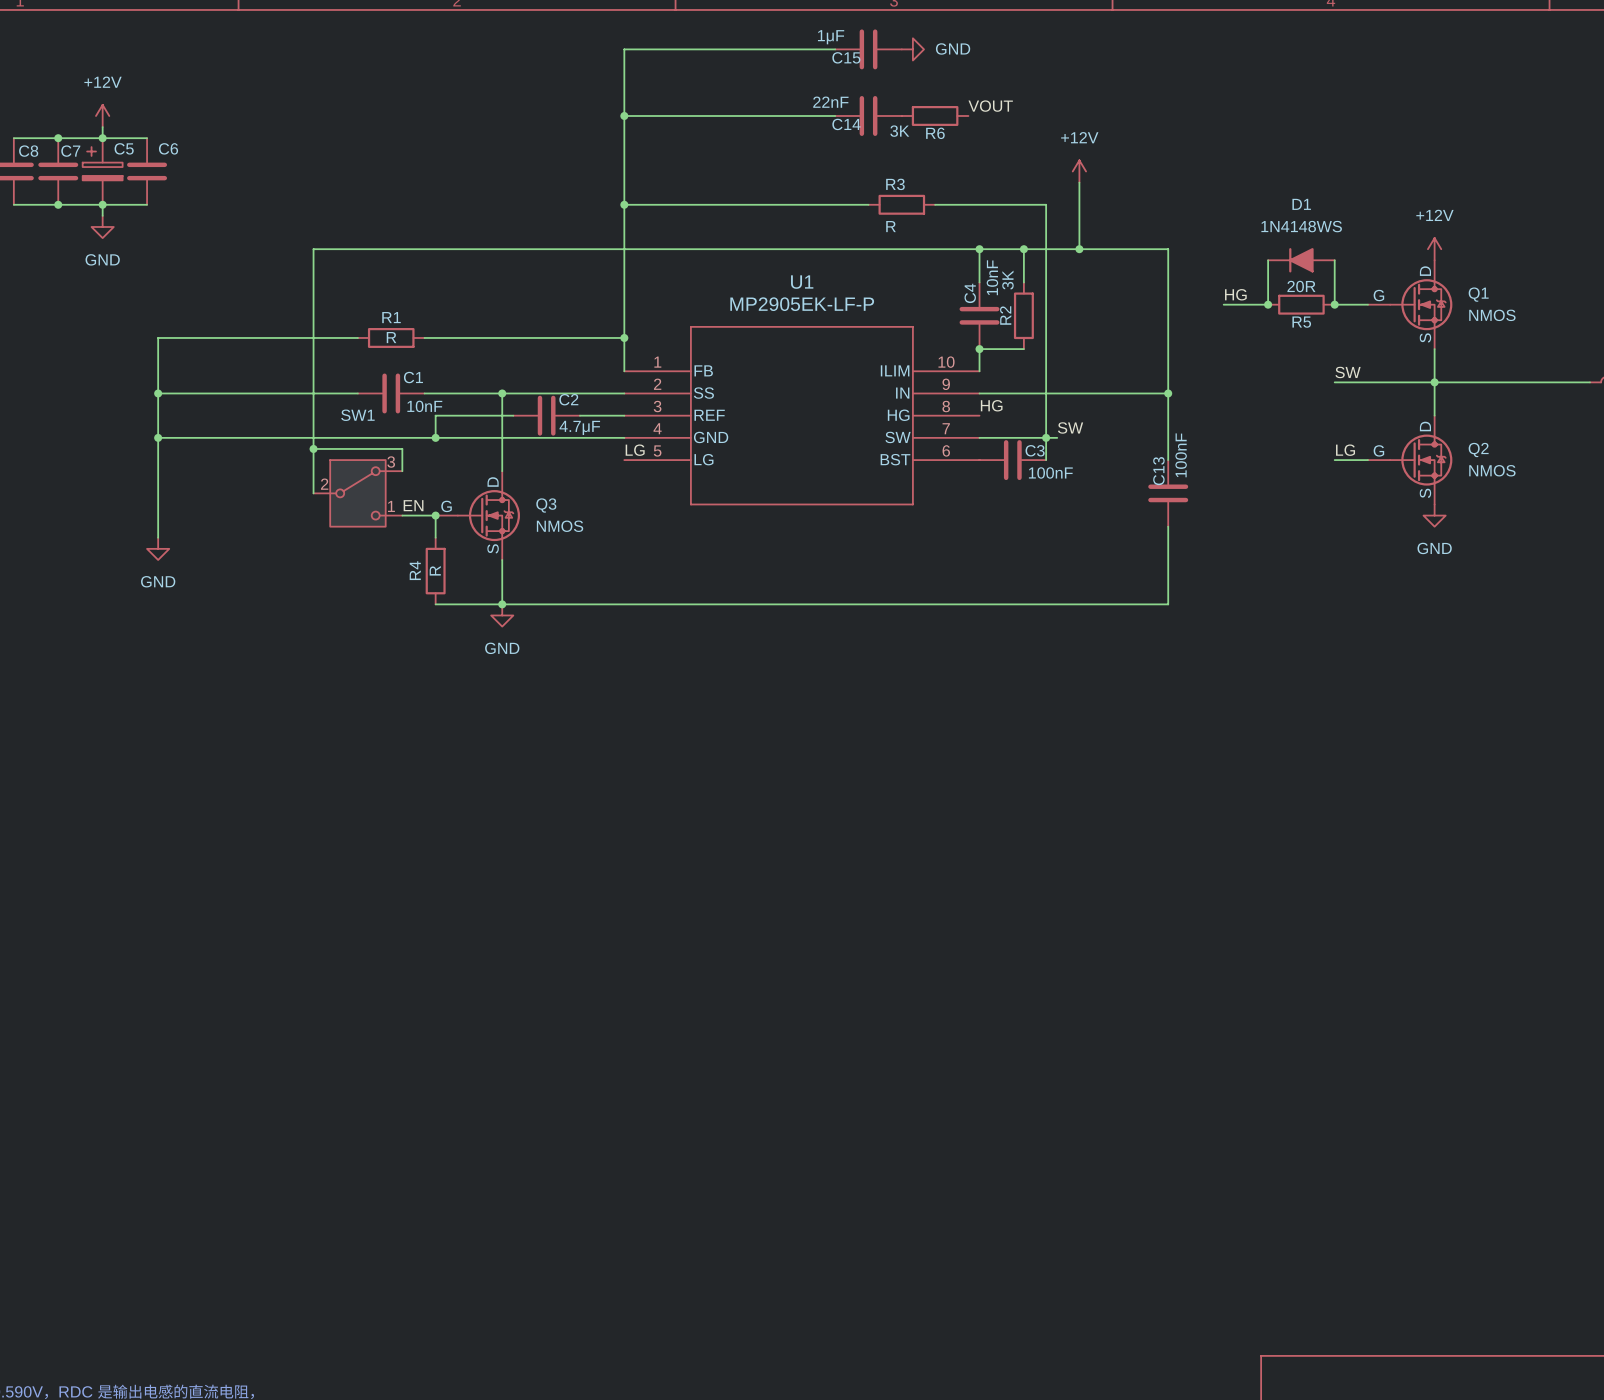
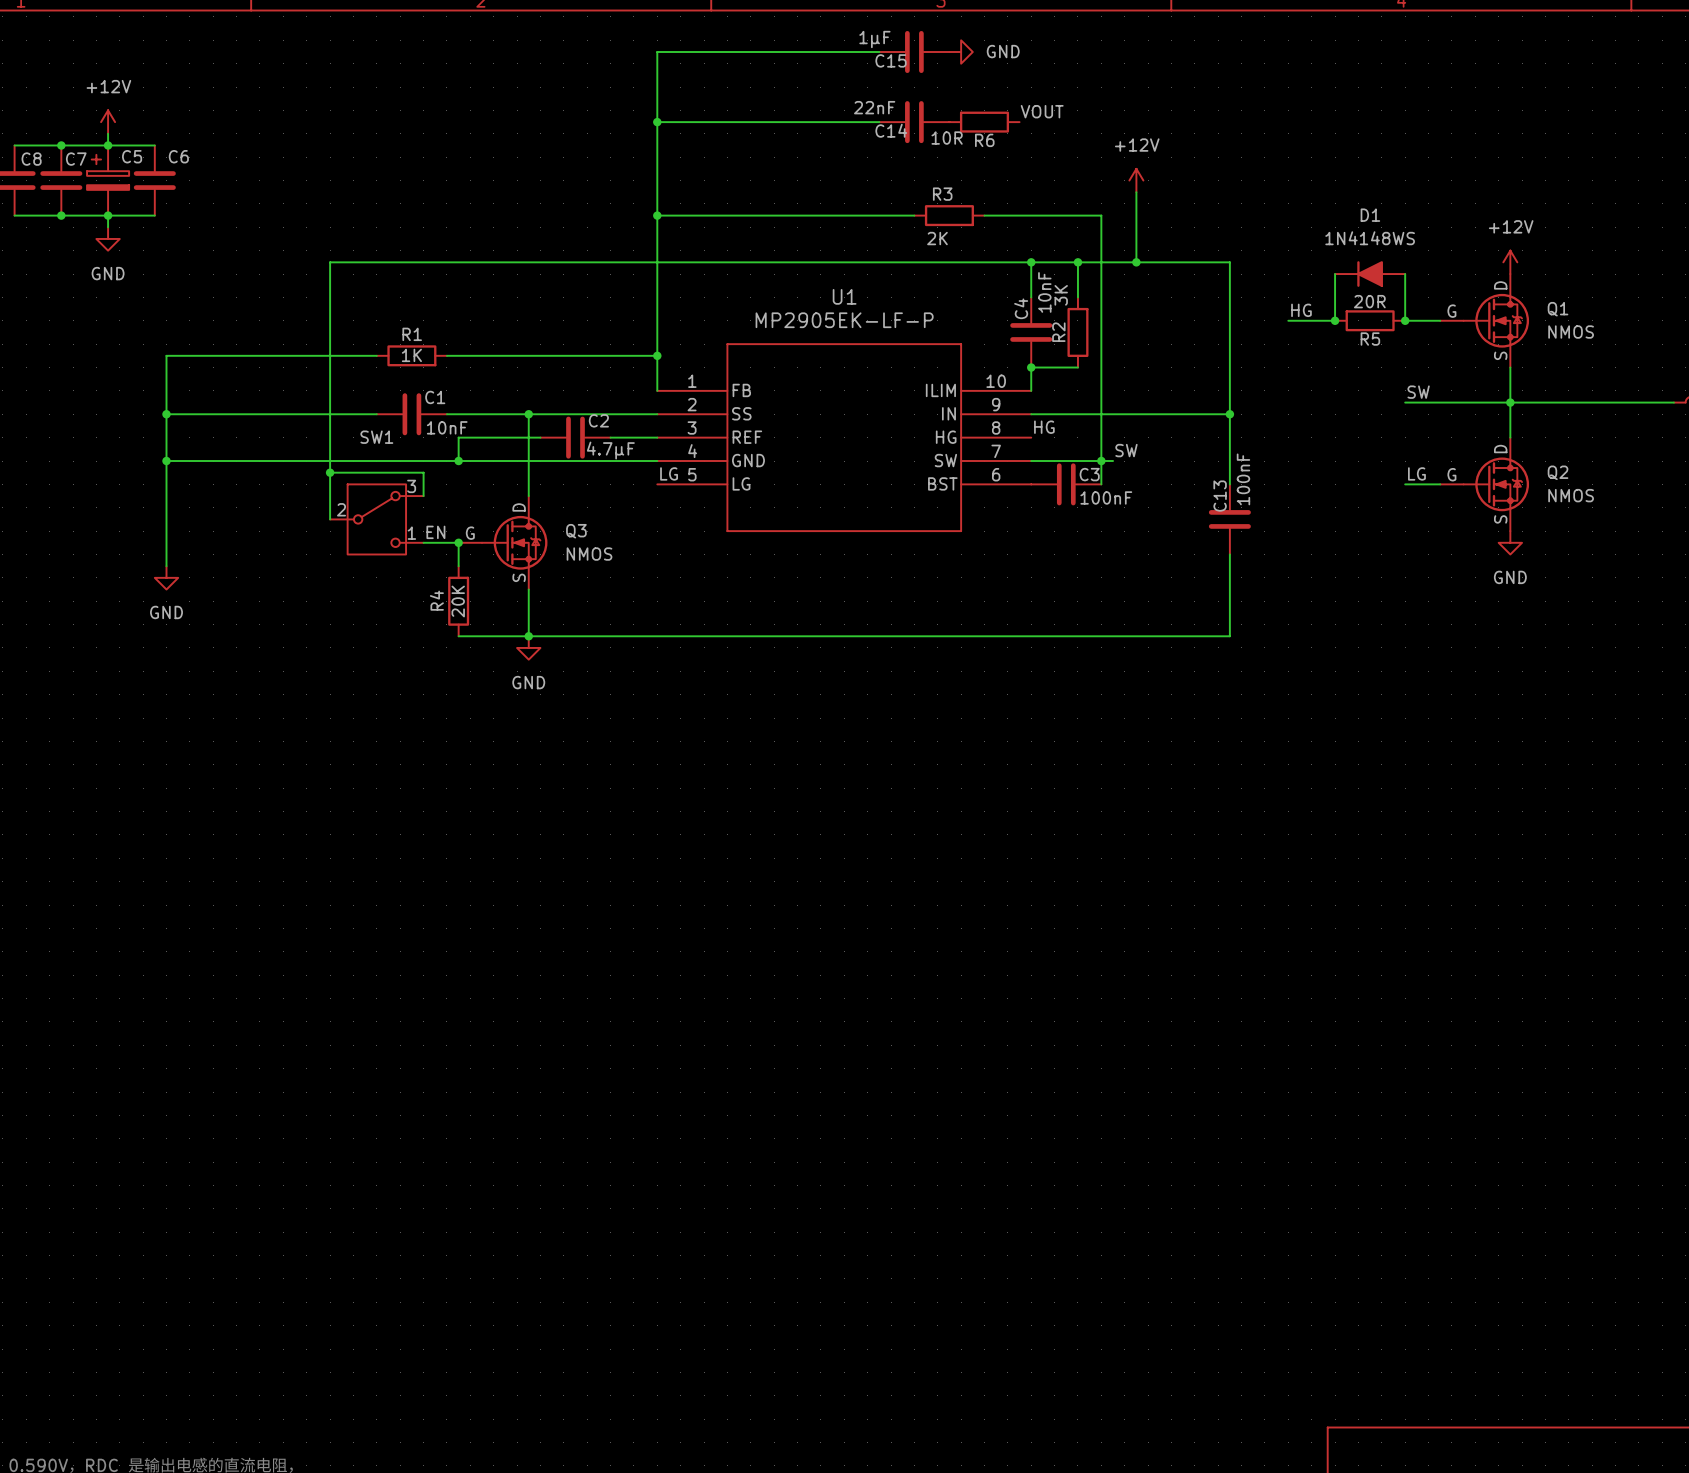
R6 value: 3K (899, 131) -> 10R (947, 138)
R3 value: R (891, 226) -> 2K (937, 238)
R1 value: R (391, 337) -> 1K (411, 355)
R4 value: R (435, 570) -> 20K (458, 601)

